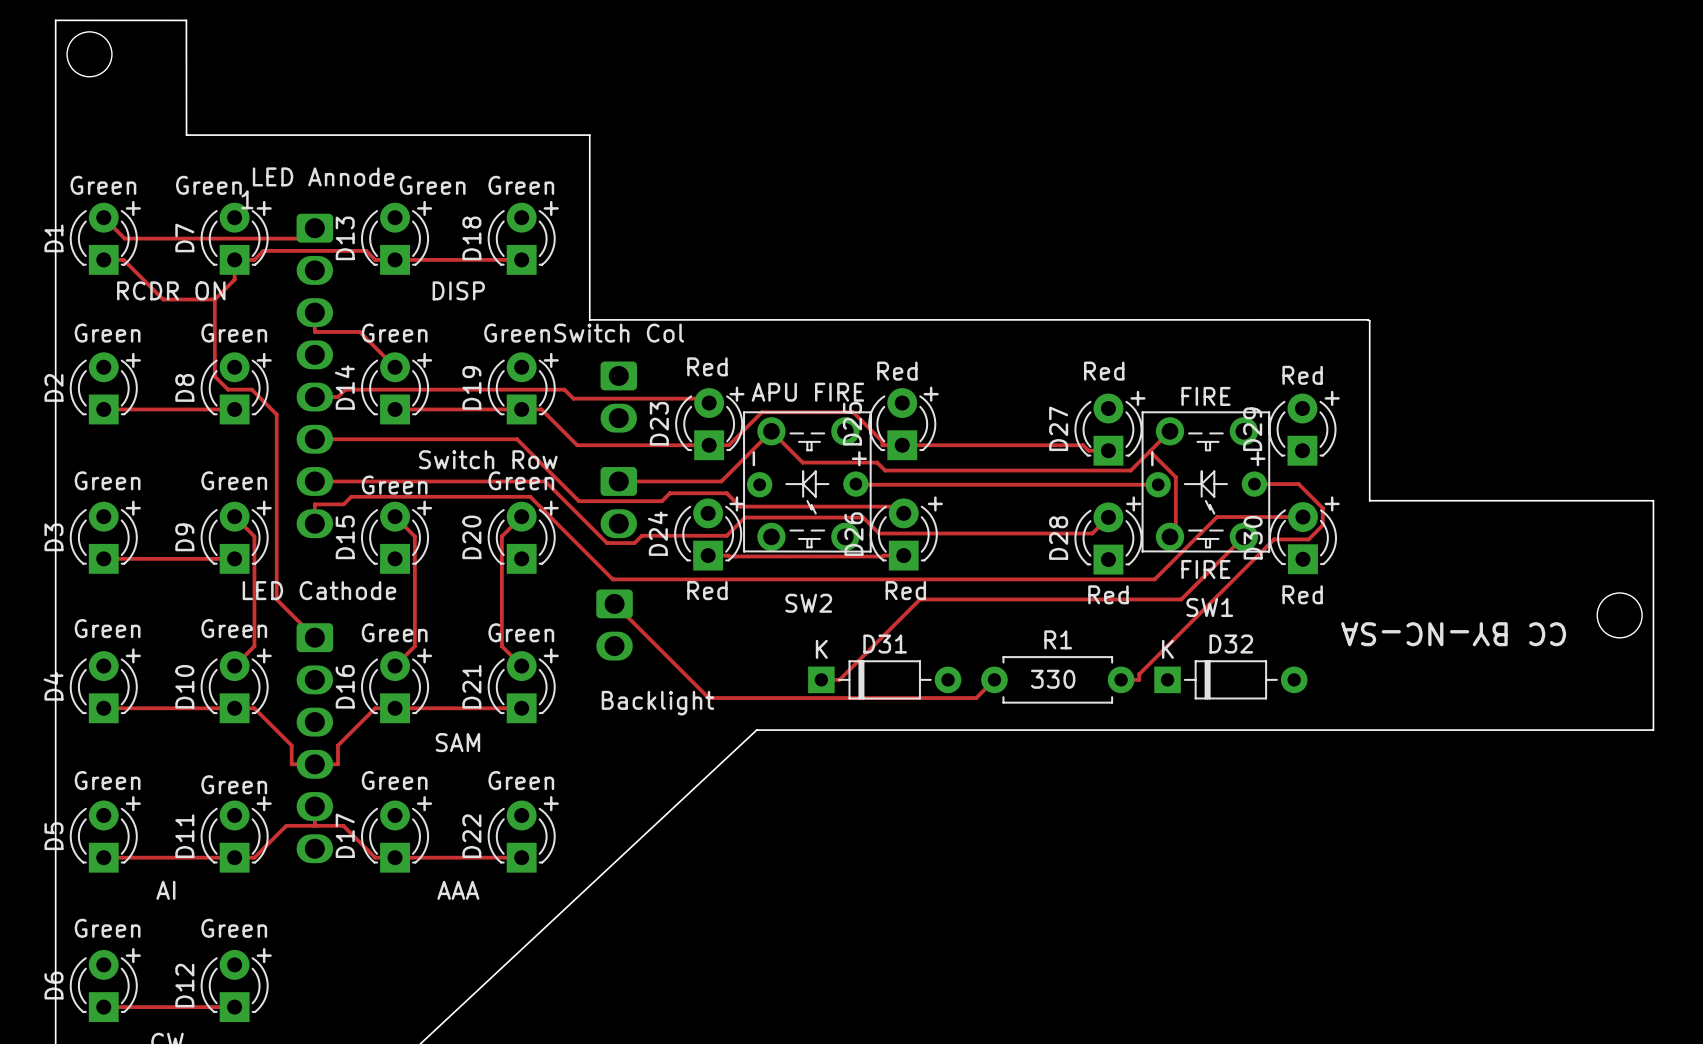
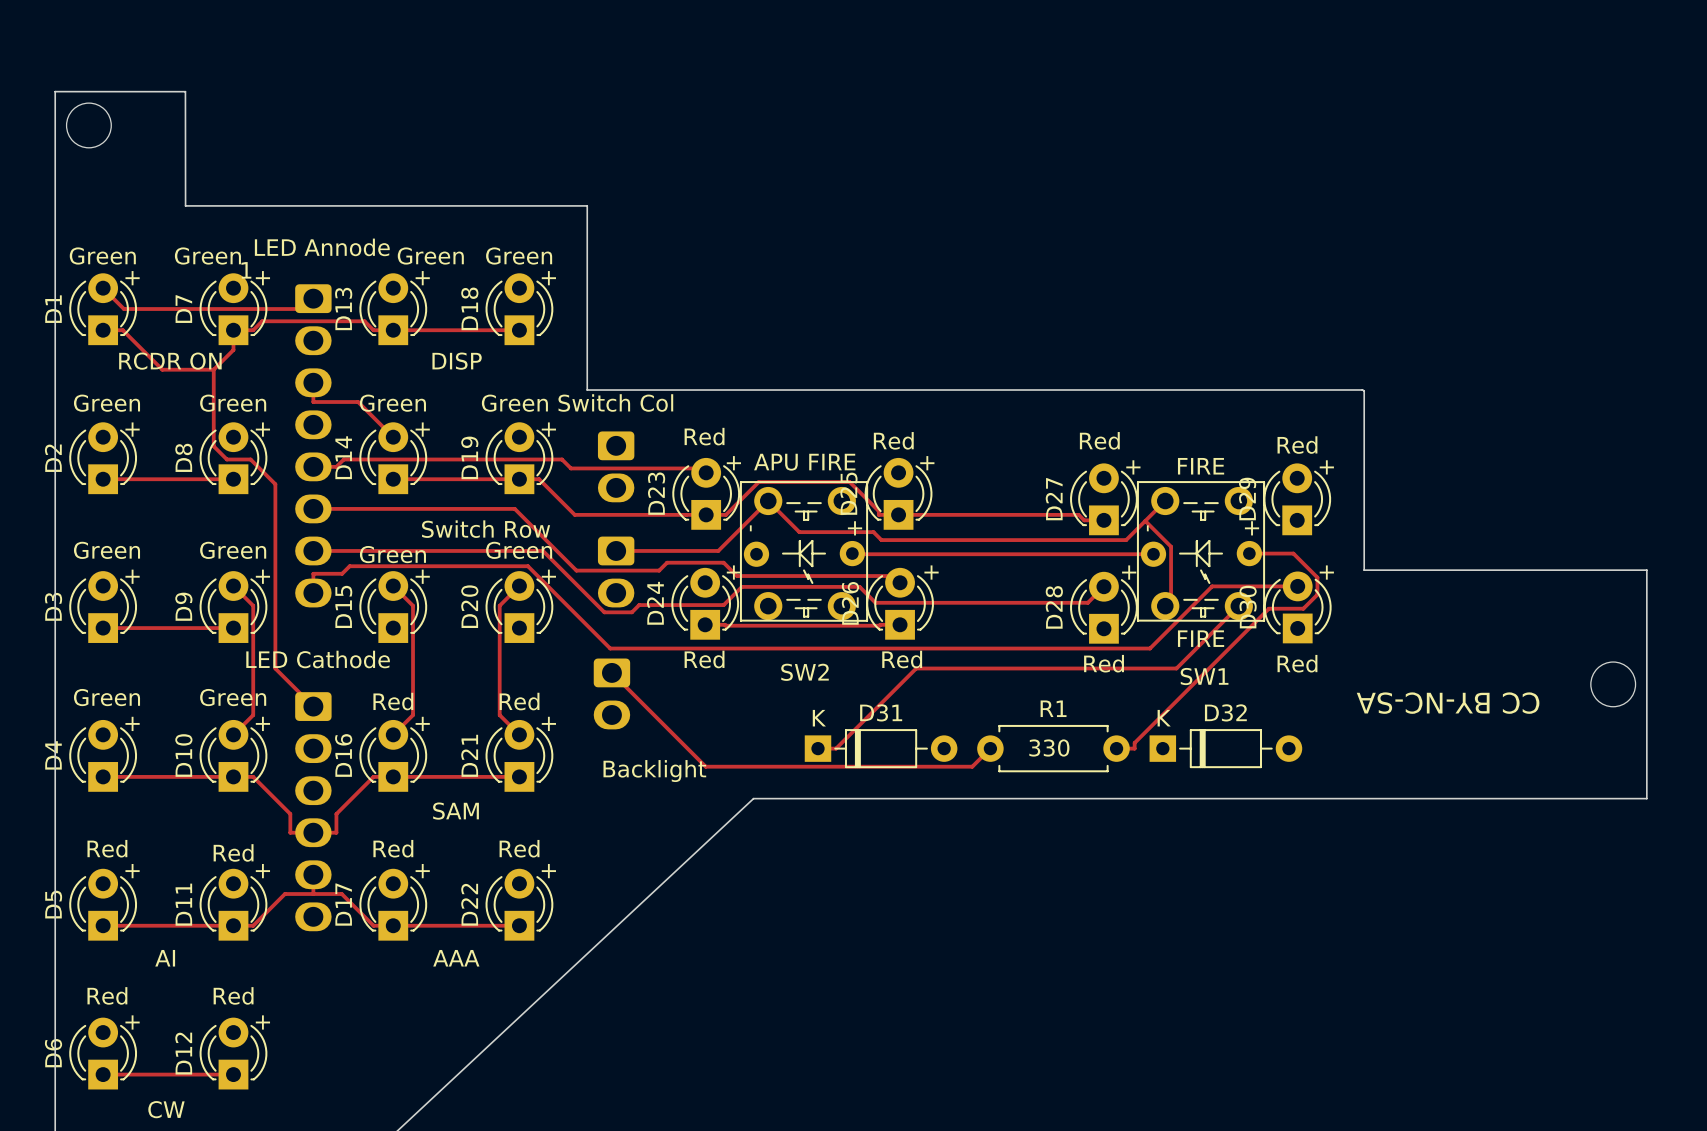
text: Green (394, 632) -> Red (393, 701)
text: Green (521, 632) -> Red (519, 701)
text: Green (107, 780) -> Red (107, 848)
text: Green (394, 780) -> Red (393, 848)
text: Green (521, 780) -> Red (519, 848)
text: Green (234, 784) -> Red (233, 852)
text: Green (107, 928) -> Red (107, 995)
text: Green (234, 928) -> Red (233, 995)

